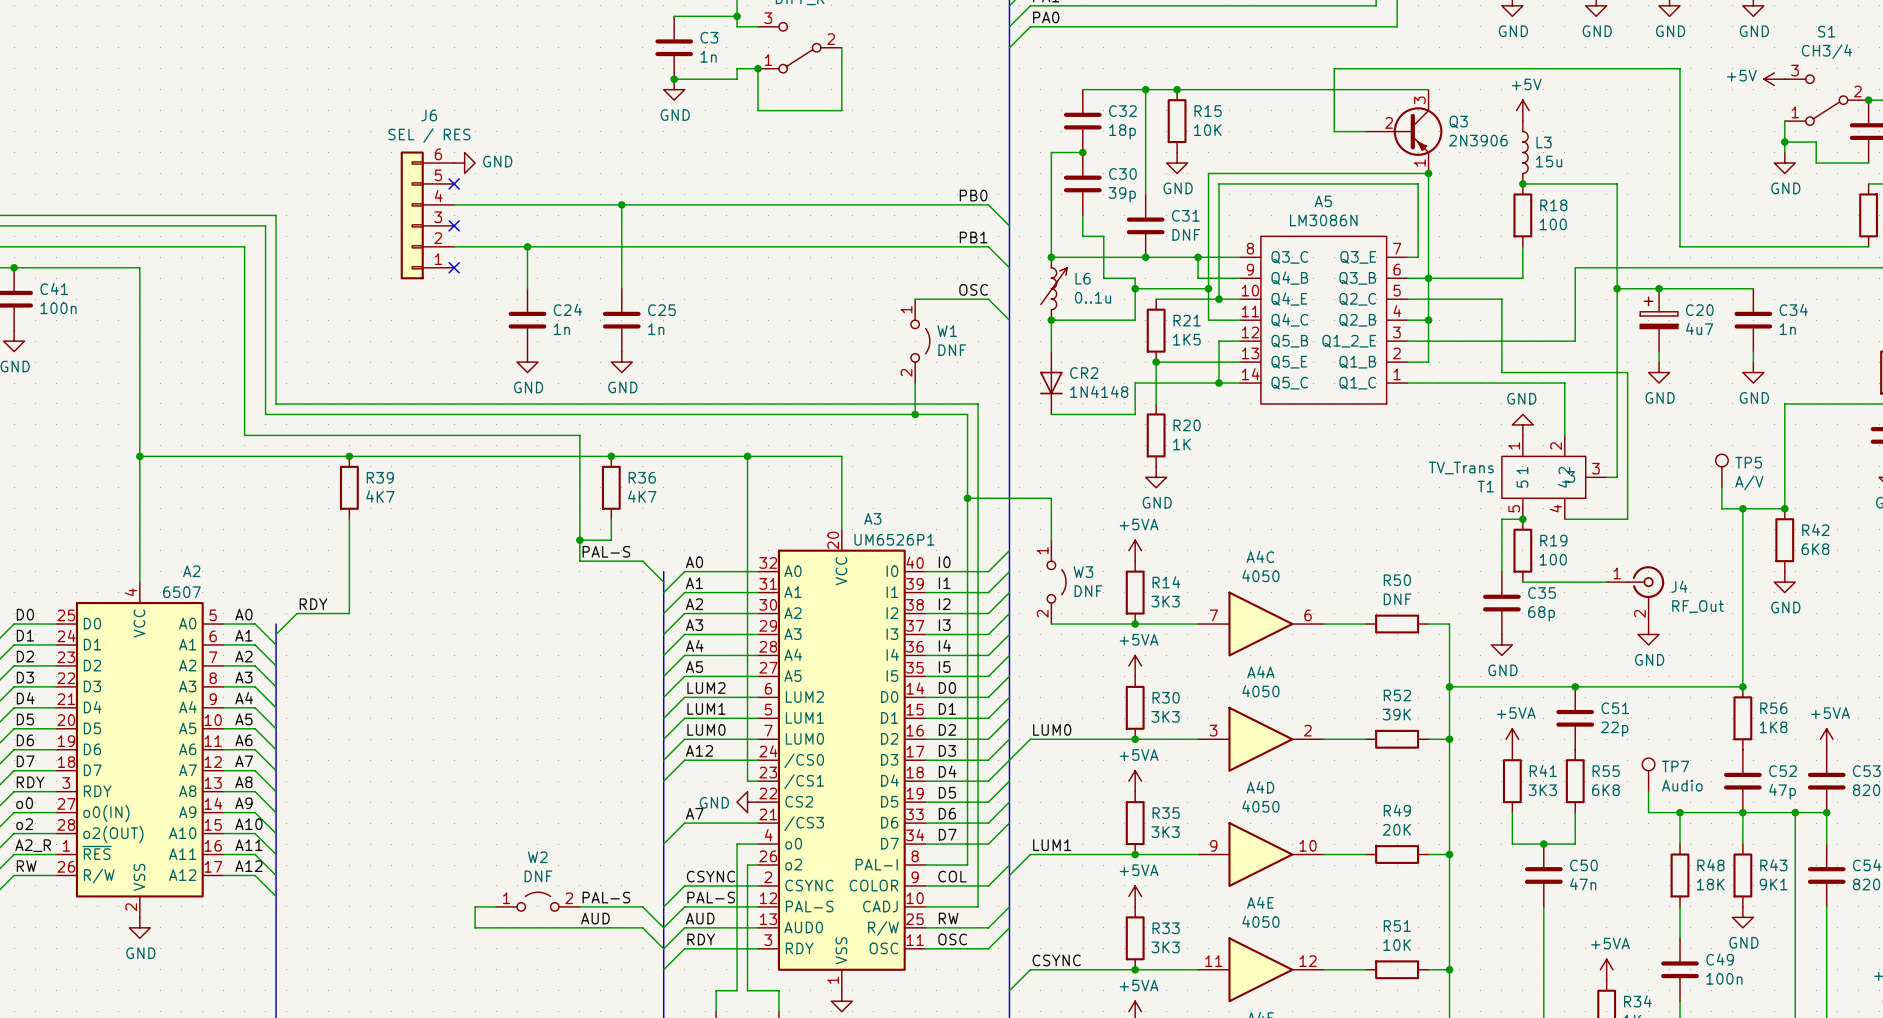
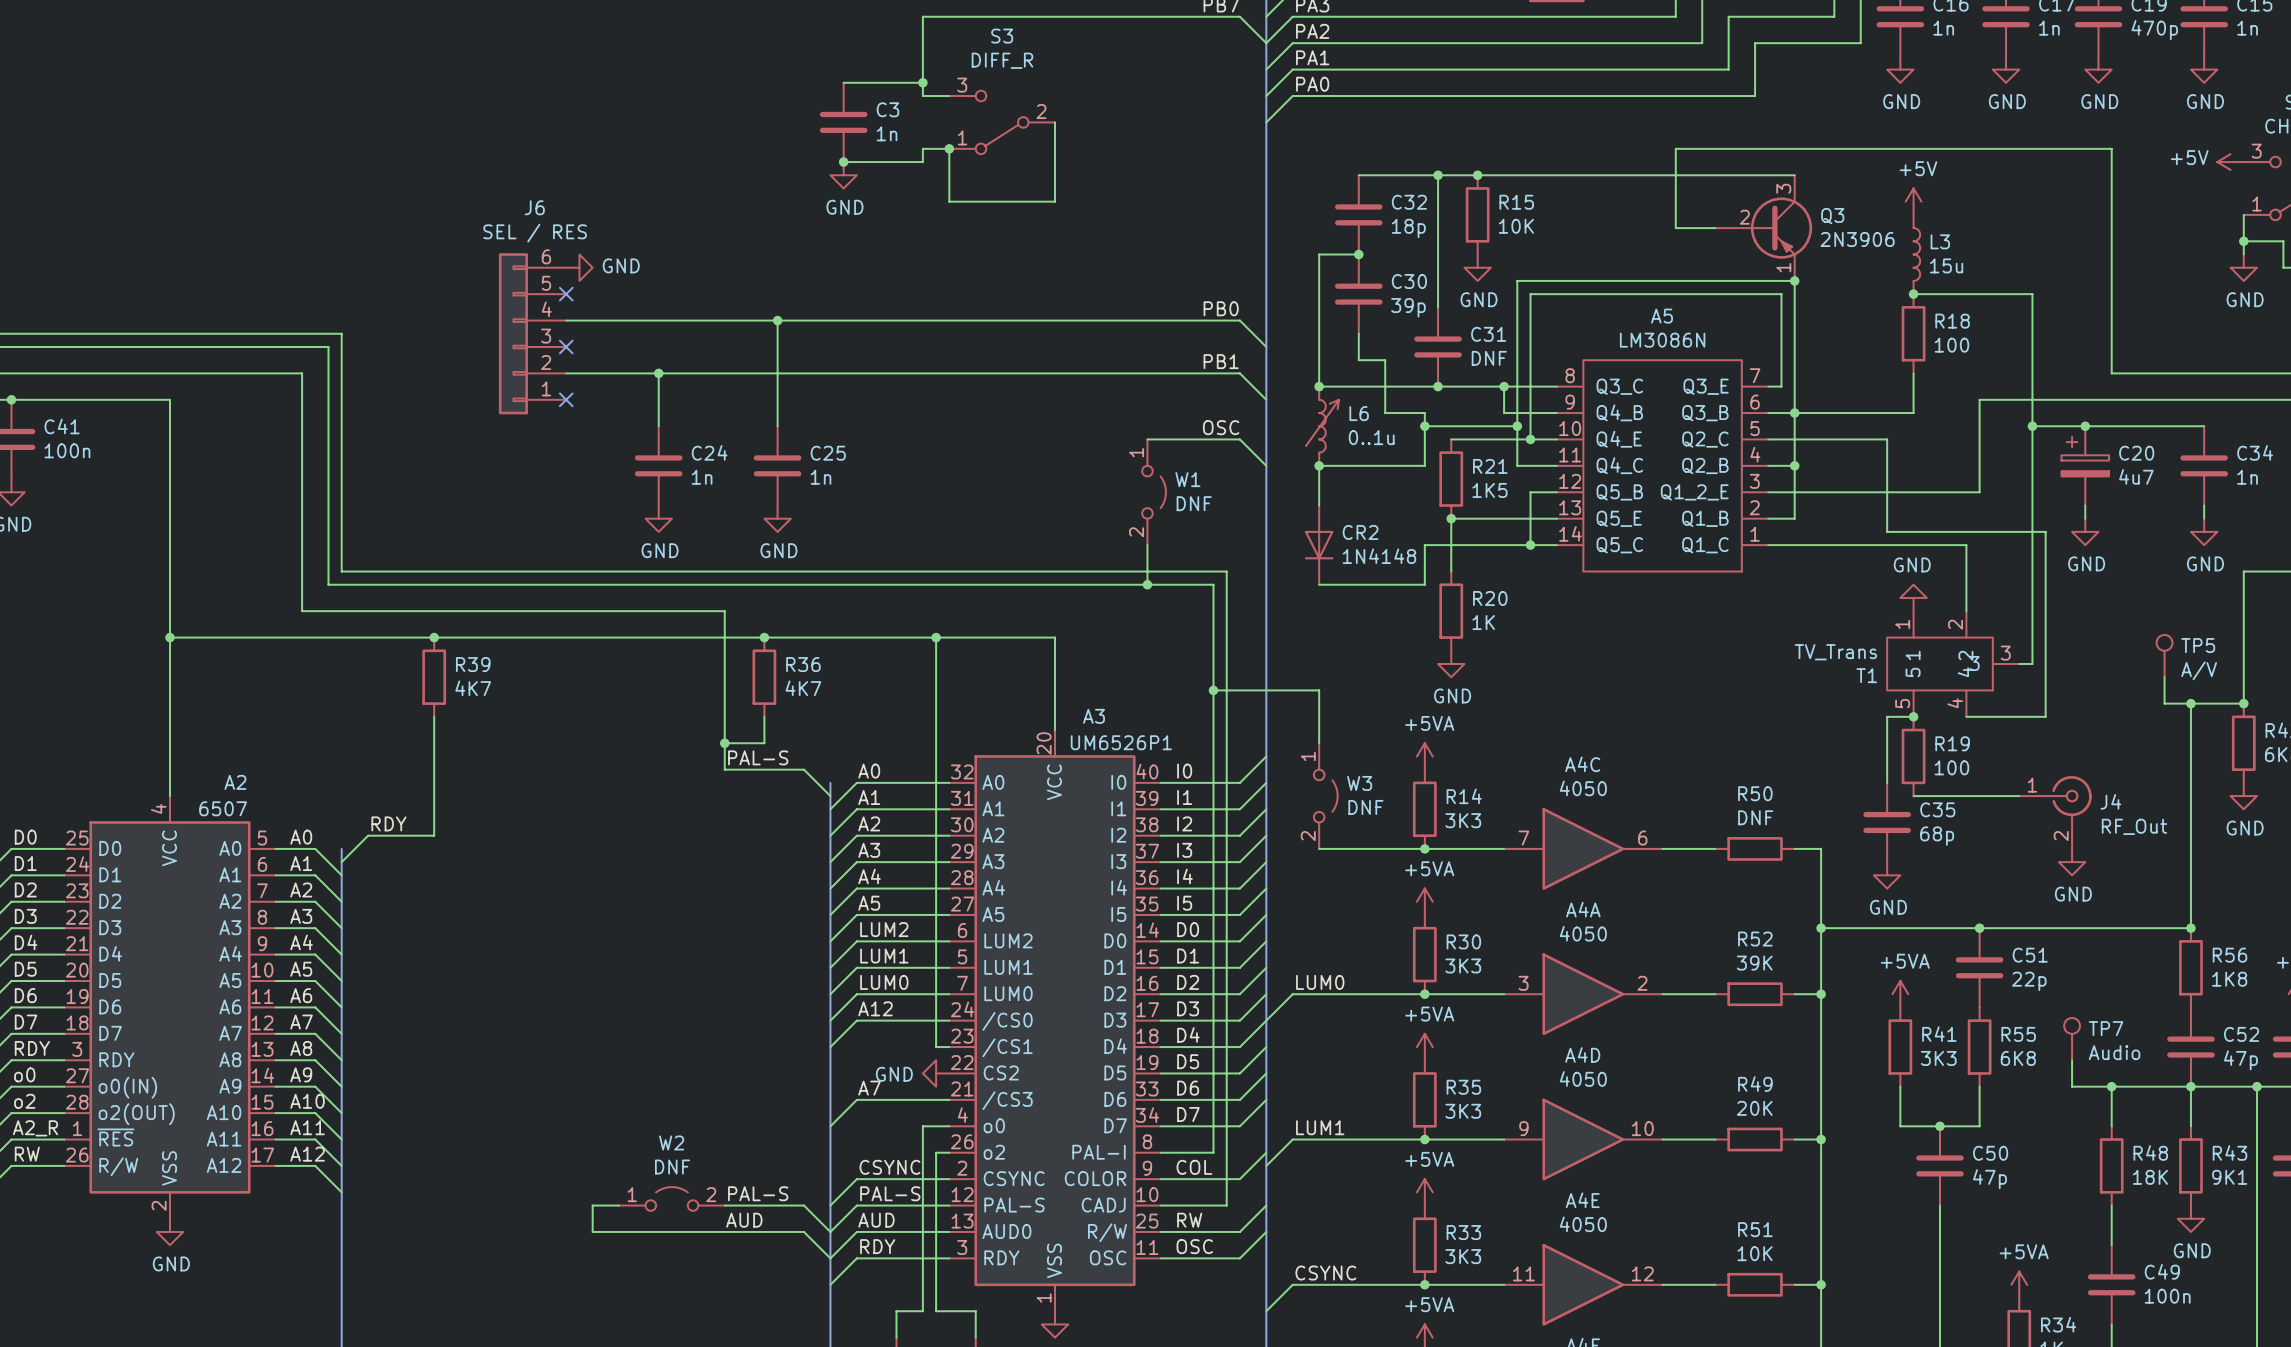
C50 value: 47n (1583, 884) -> 47p (1989, 1179)

